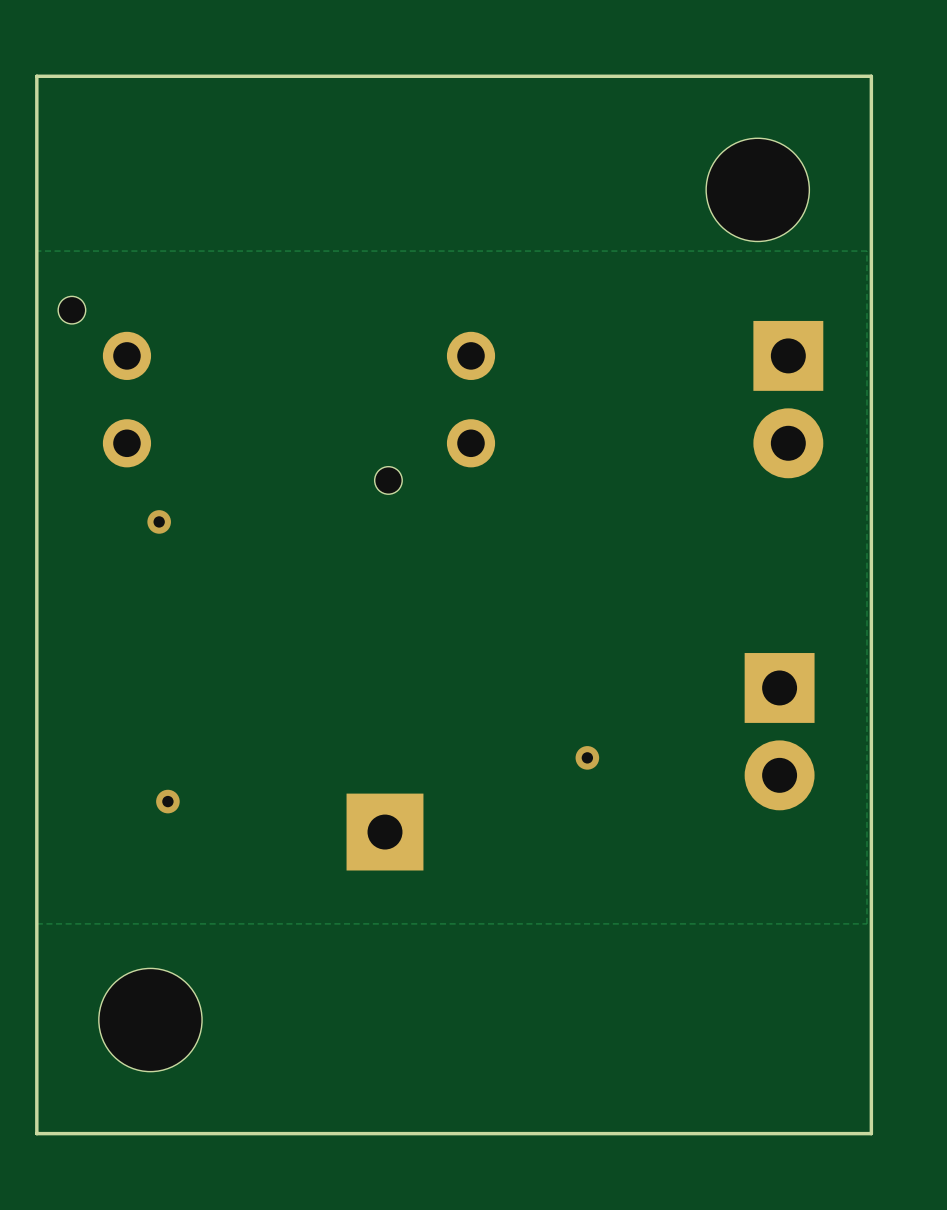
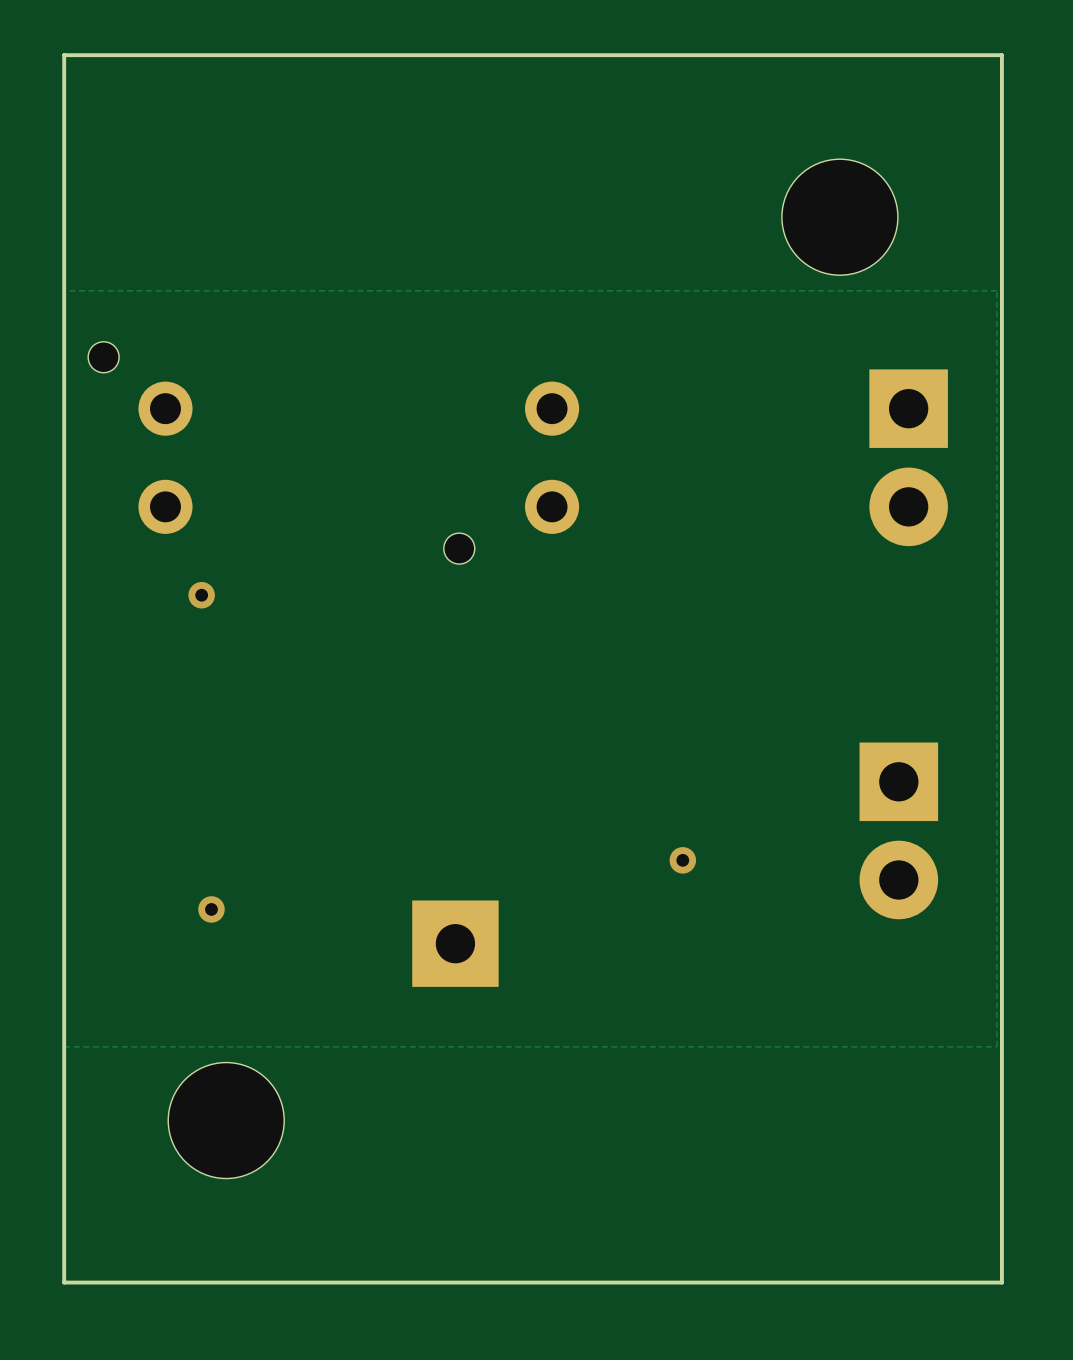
board edge: (871, 76) (36, 76) -> (1001, 94) (1001, 55) (64, 55) (64, 94)
part position: (757, 189) -> (839, 217)
part position: (150, 1020) -> (226, 1120)

